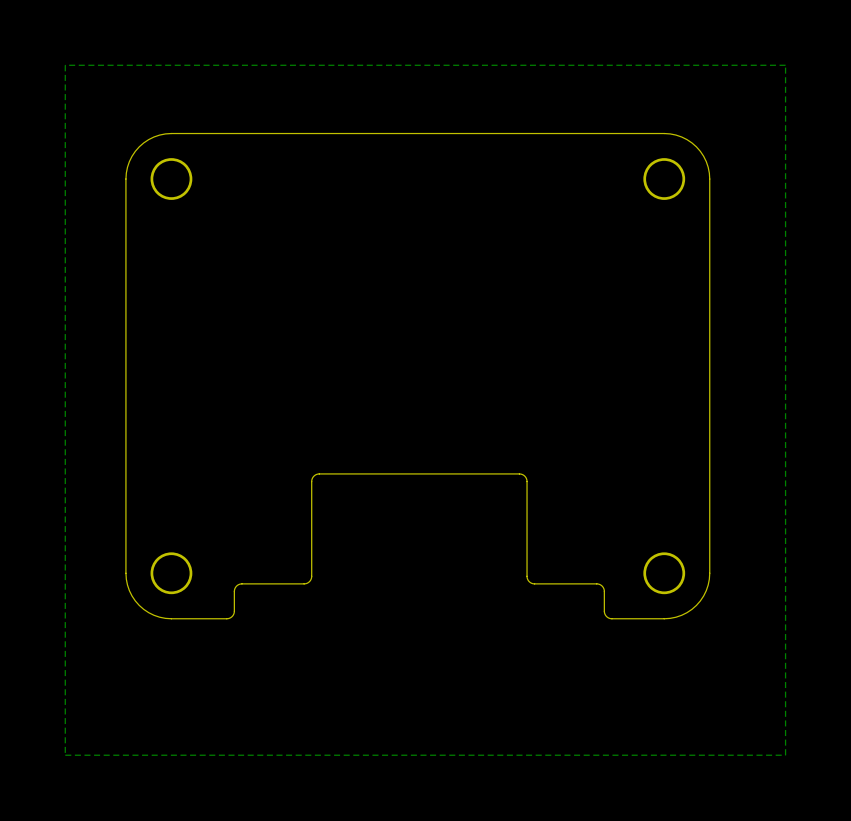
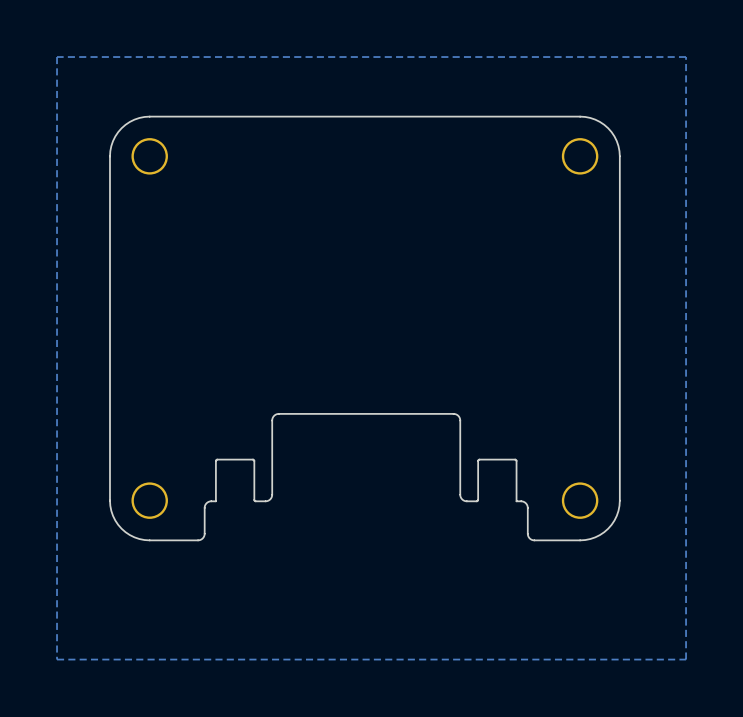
board edge: (311, 566) (311, 578) (306, 583) (240, 583) (235, 586) (234, 591) -> (272, 494) (267, 501) (254, 500) (253, 459) (216, 459) (215, 501) (206, 503) (204, 516)
board edge: (527, 566) (527, 578) (532, 583) (597, 583) (602, 586) (604, 591) -> (460, 494) (465, 501) (477, 500) (478, 459) (515, 459) (516, 501) (526, 503) (527, 516)

